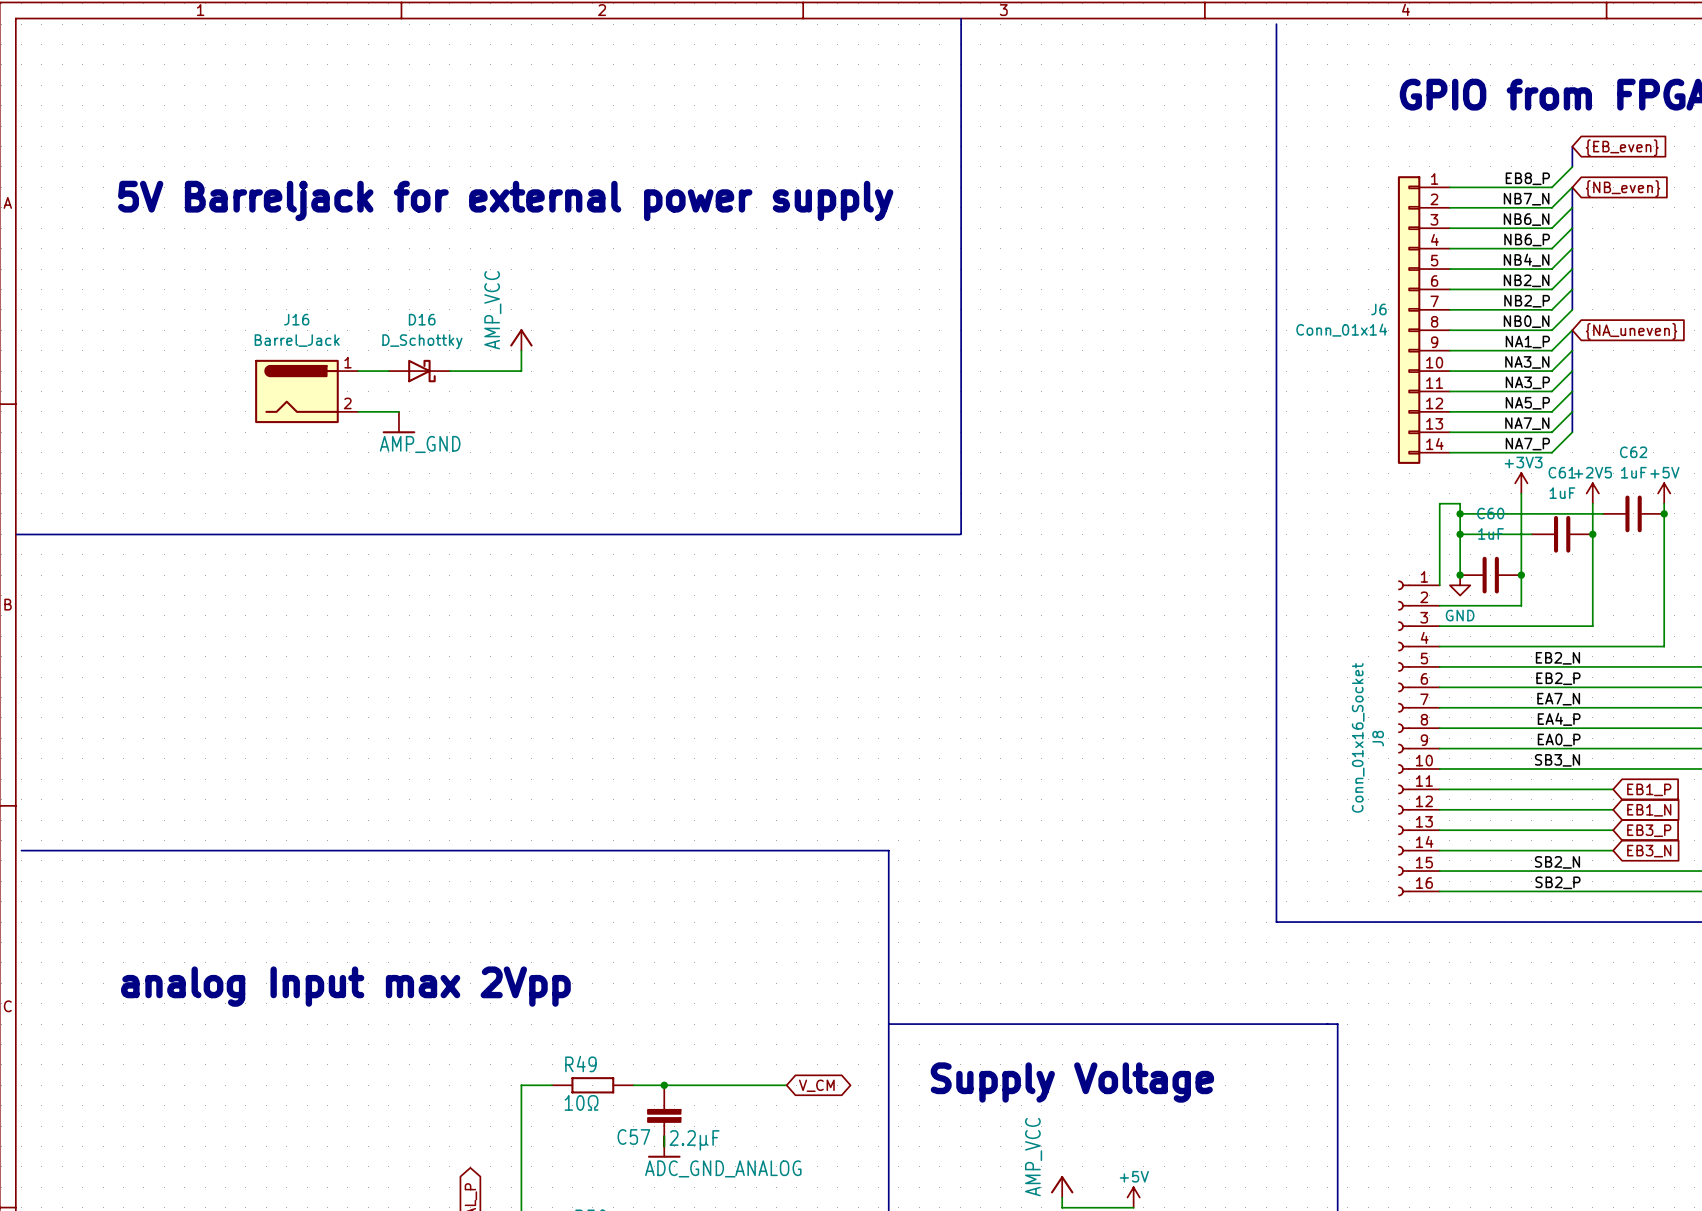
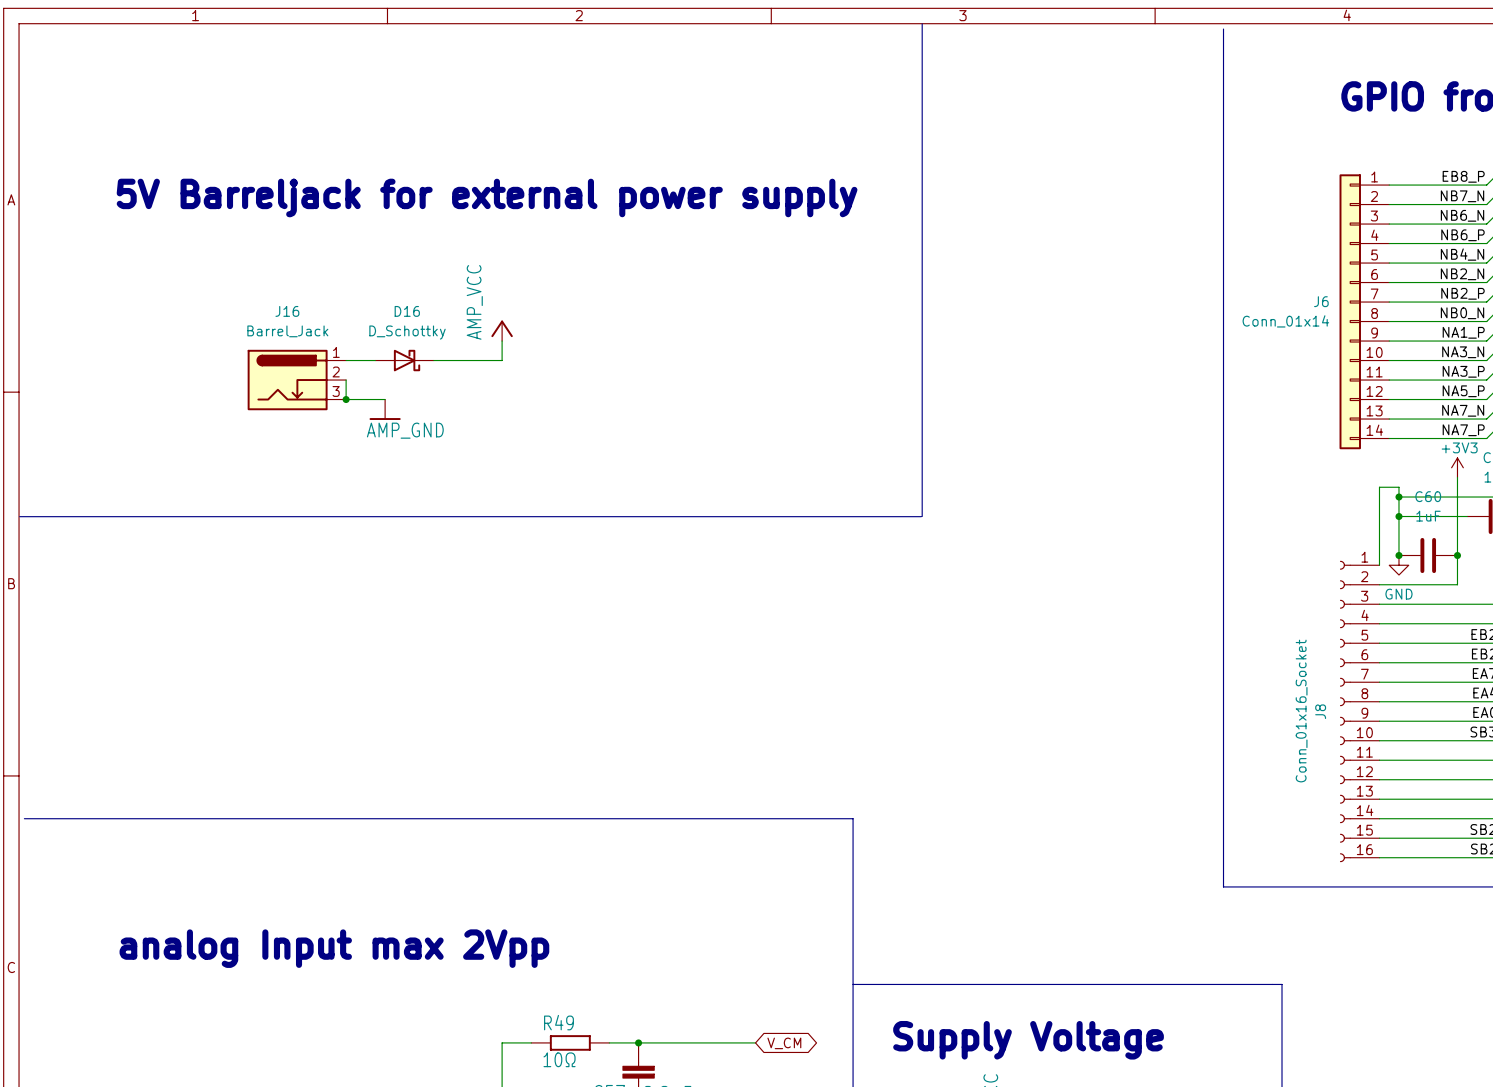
J16 symbol: [255, 359, 359, 424] -> [247, 349, 347, 411]
wire: none -> (346, 380) (346, 399)
junction: none -> (346, 399)

